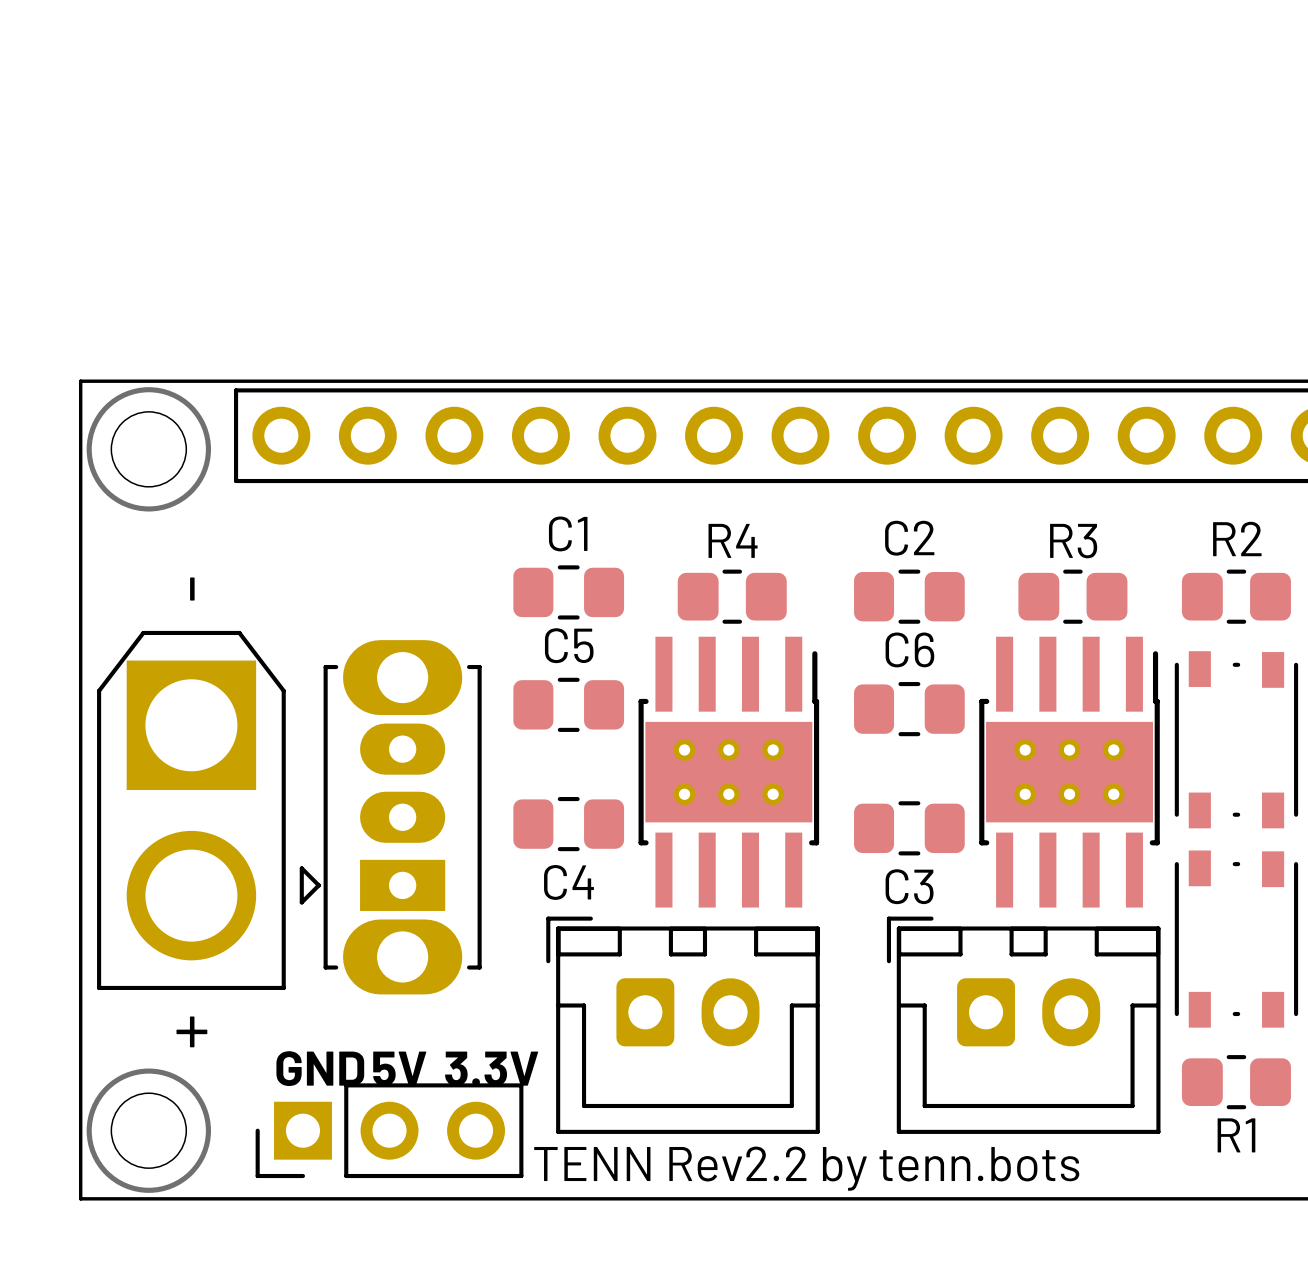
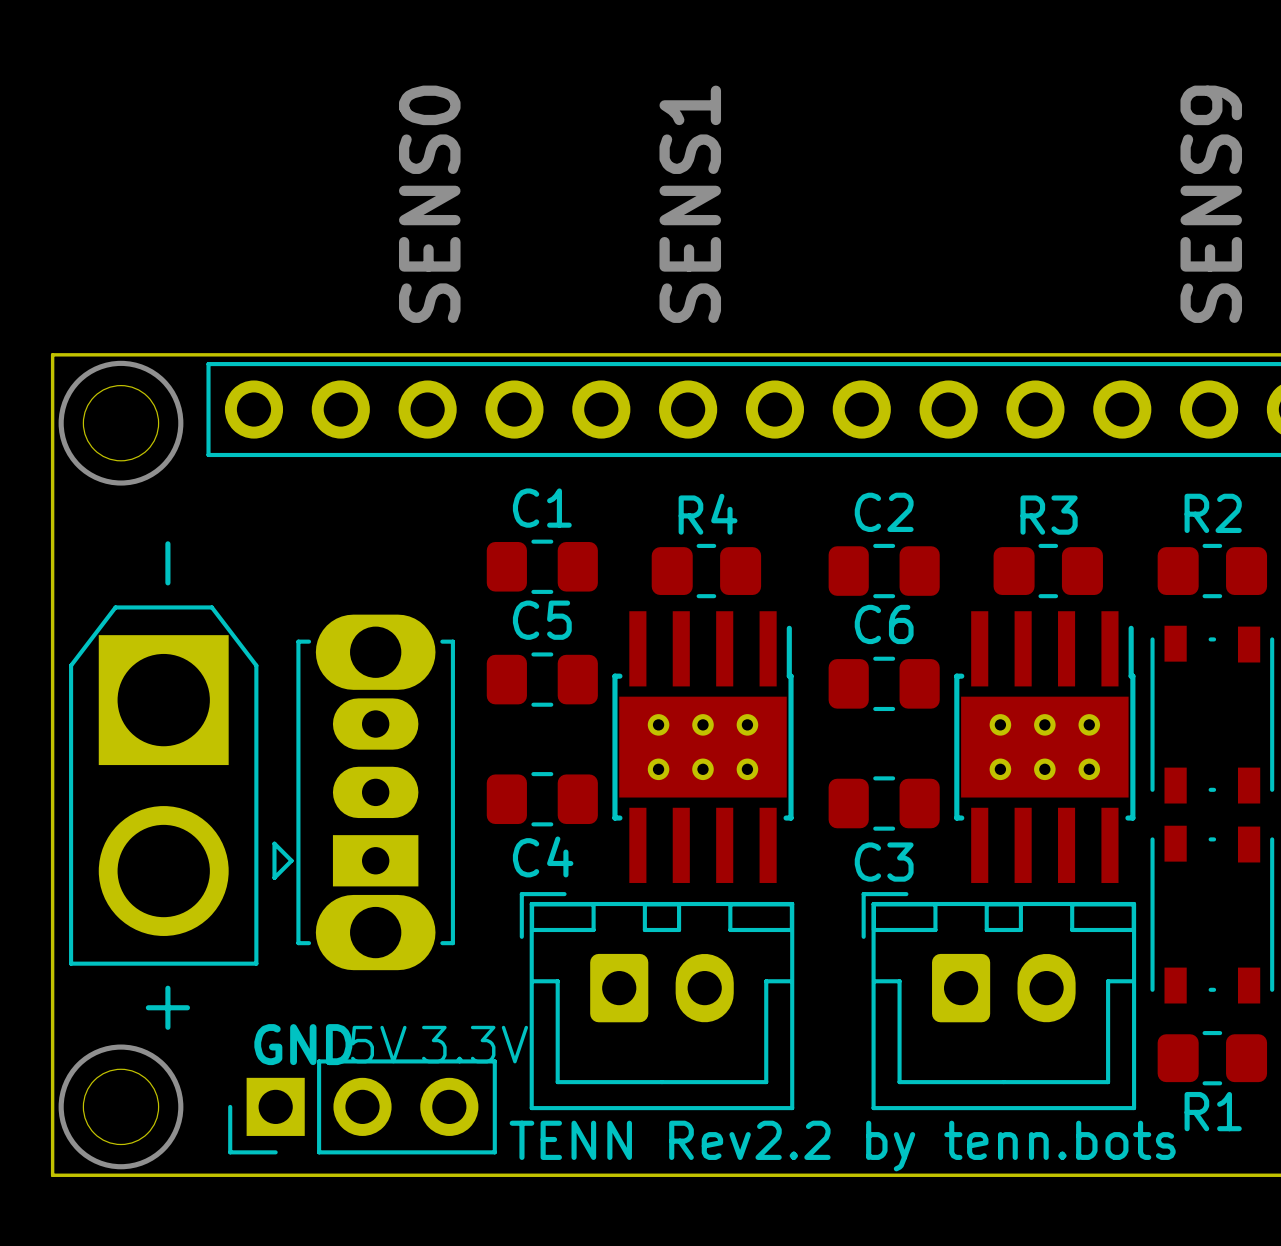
text: none -> SENS0 (429, 204)
text: none -> SENS9 (1211, 204)
text: none -> SENS1 (690, 204)

